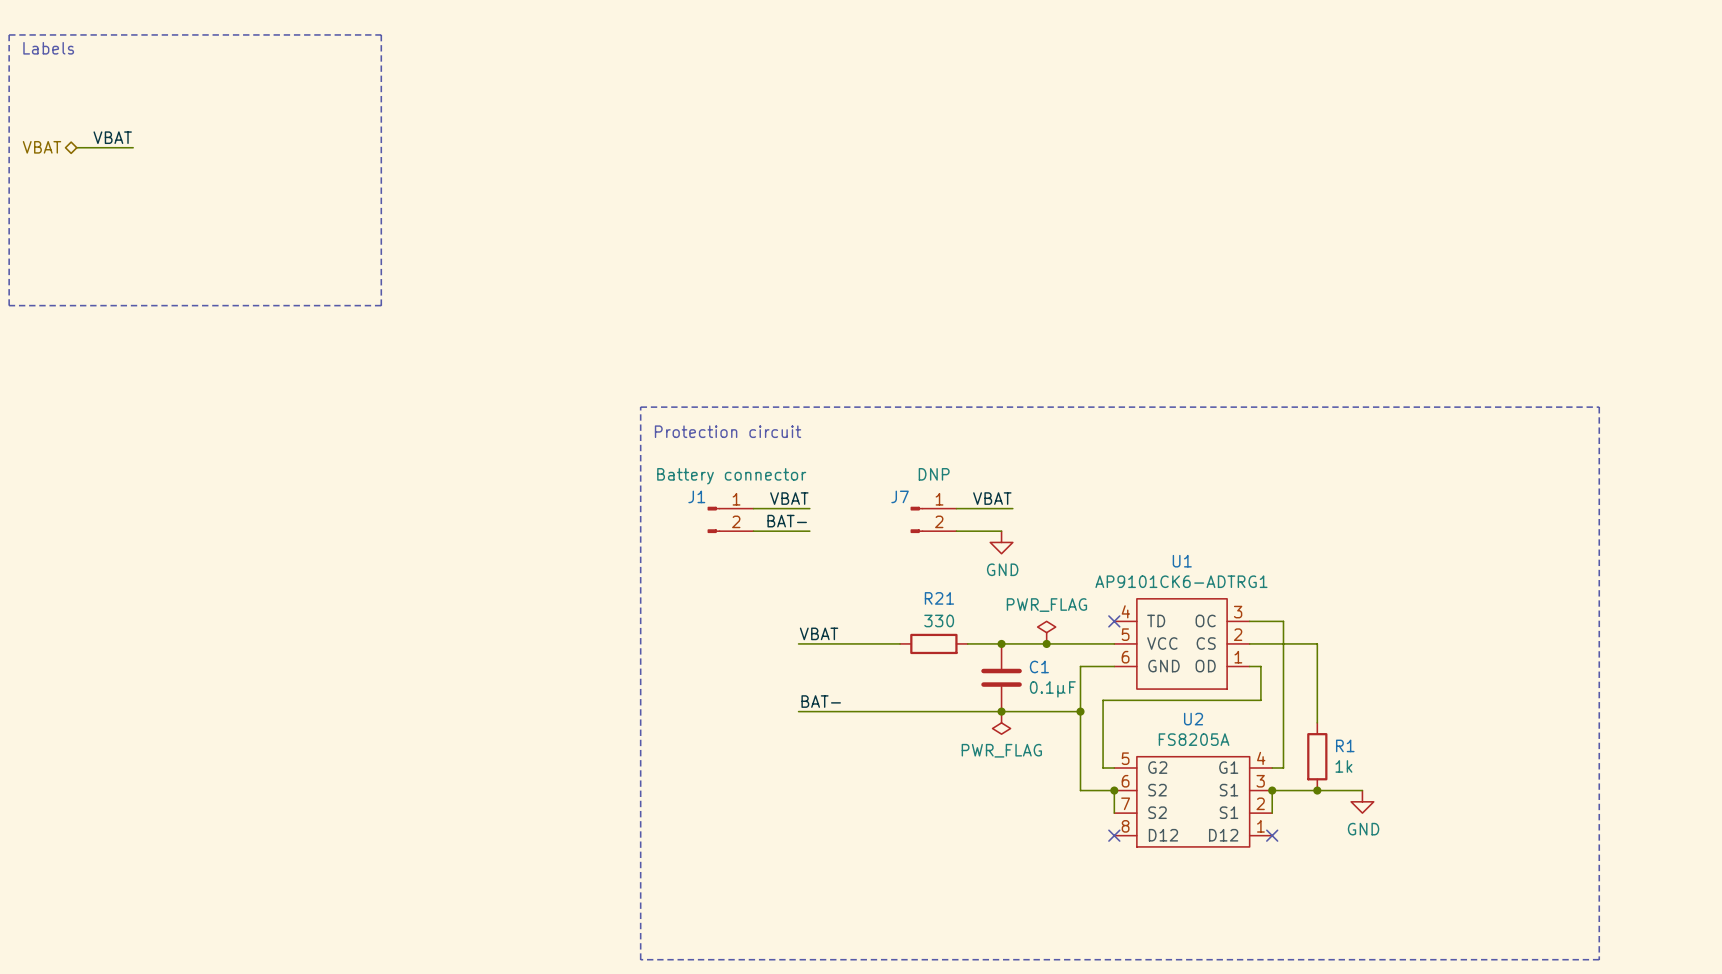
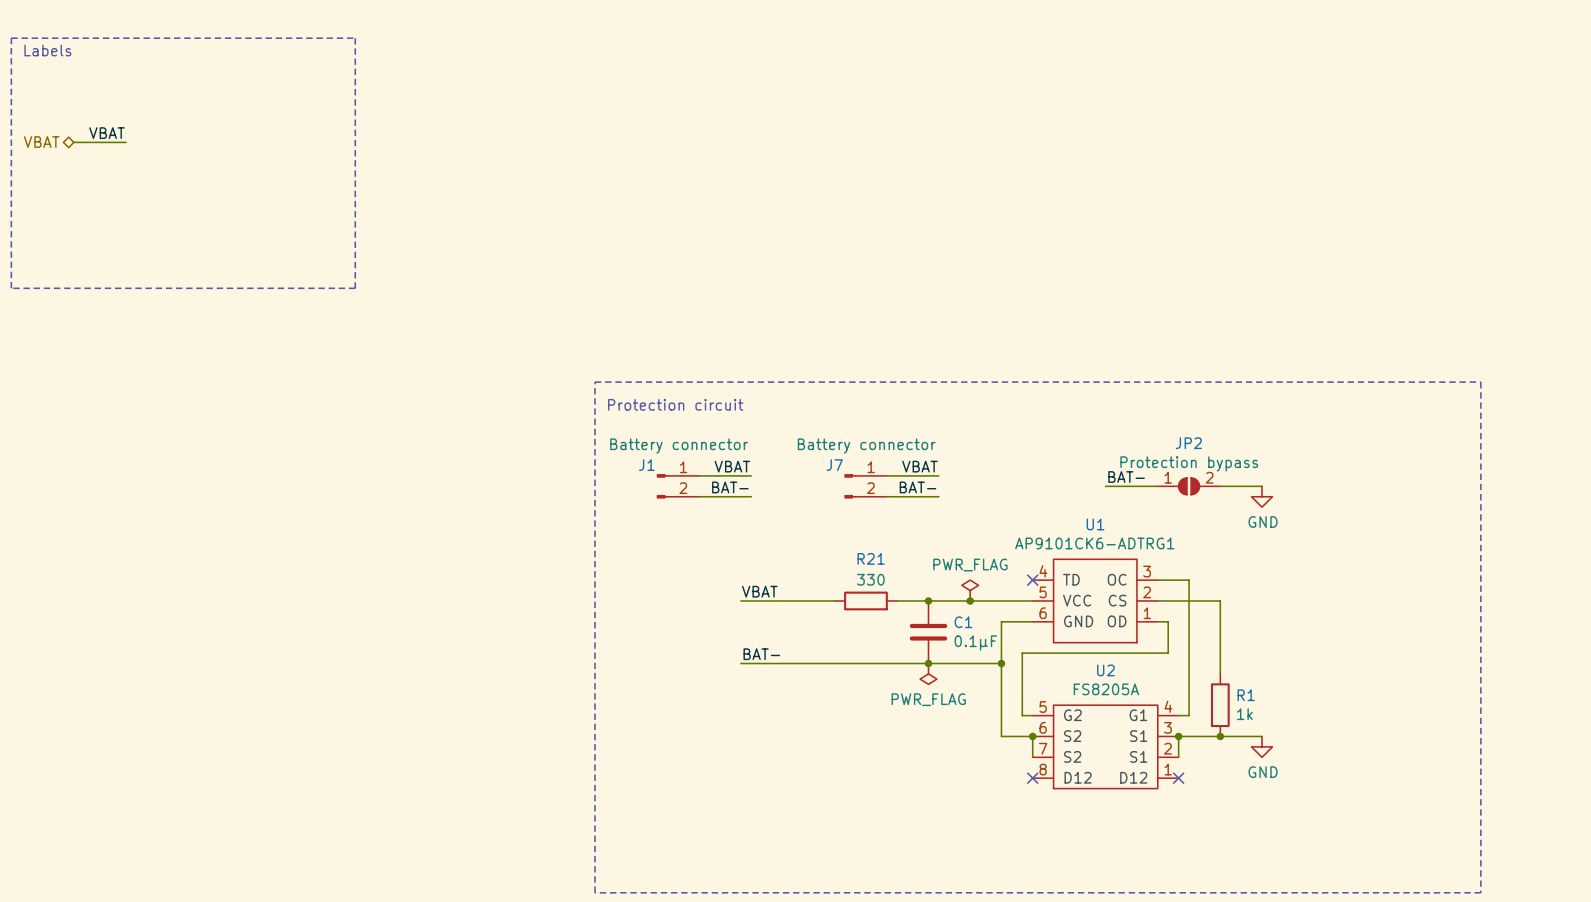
J7 value: DNP (934, 474) -> Battery connector (866, 445)
label: none -> BAT- (1126, 477)
wire: none -> (1105, 486) (1157, 486)
JP2: none -> Protection bypass (1189, 486)
wire: none -> (1220, 486) (1262, 486)
label: none -> BAT- (917, 487)
wire: none -> (928, 496) (938, 496)
power symbol: none -> GND (1262, 496)
power symbol: GND (1001, 542) -> none

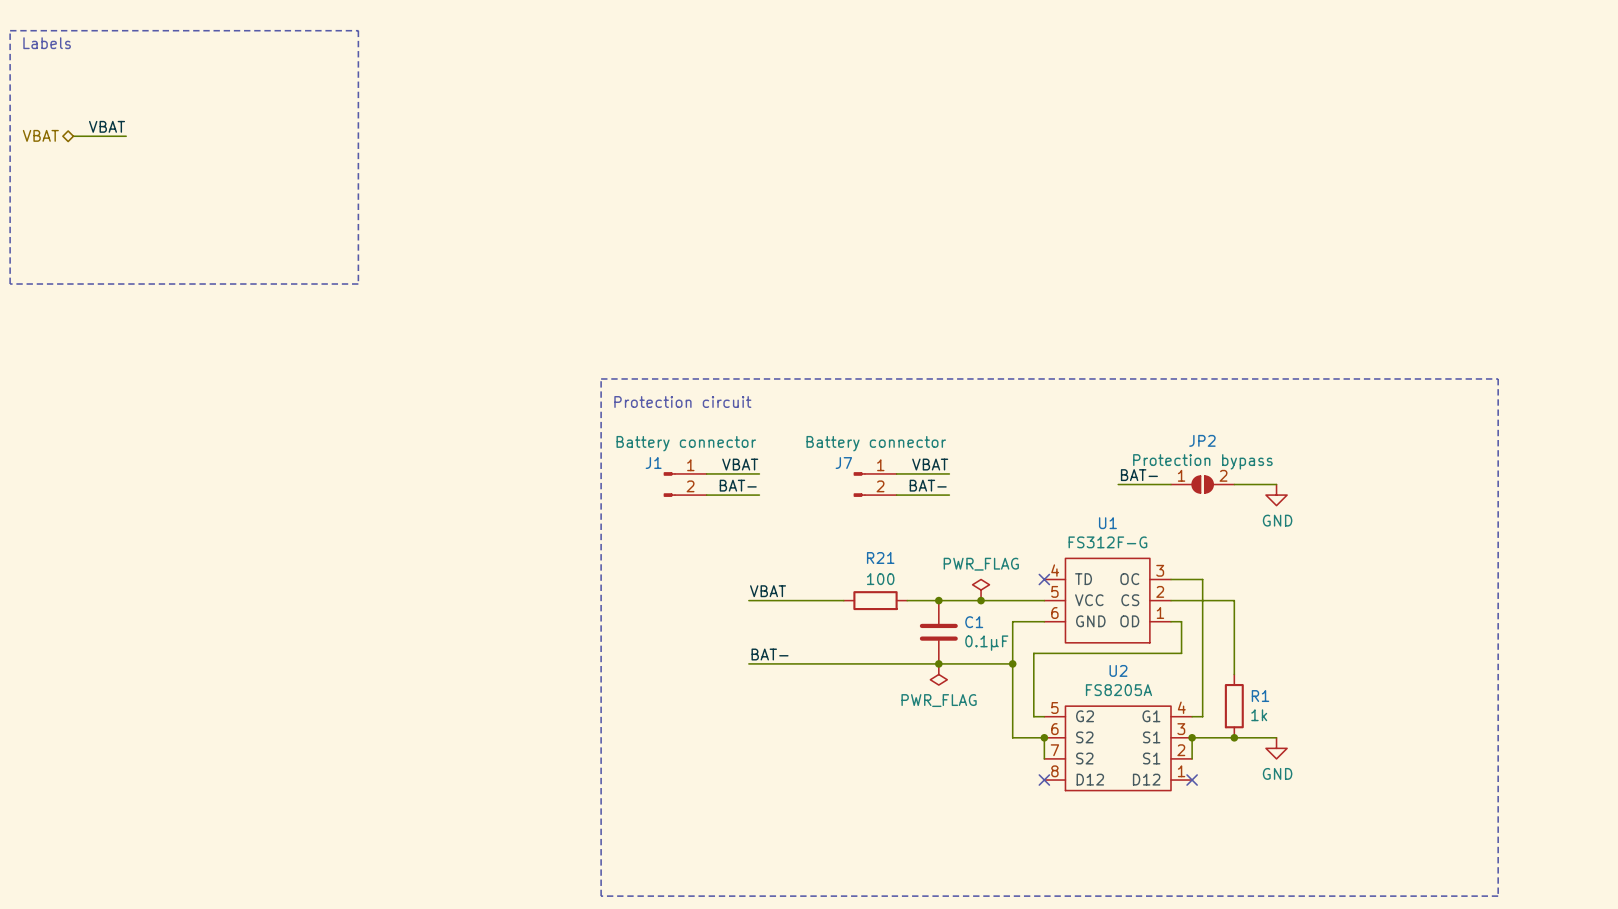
U1 value: AP9101CK6-ADTRG1 (1094, 543) -> FS312F-G (1107, 542)
R21 value: 330 (870, 579) -> 100 (880, 579)

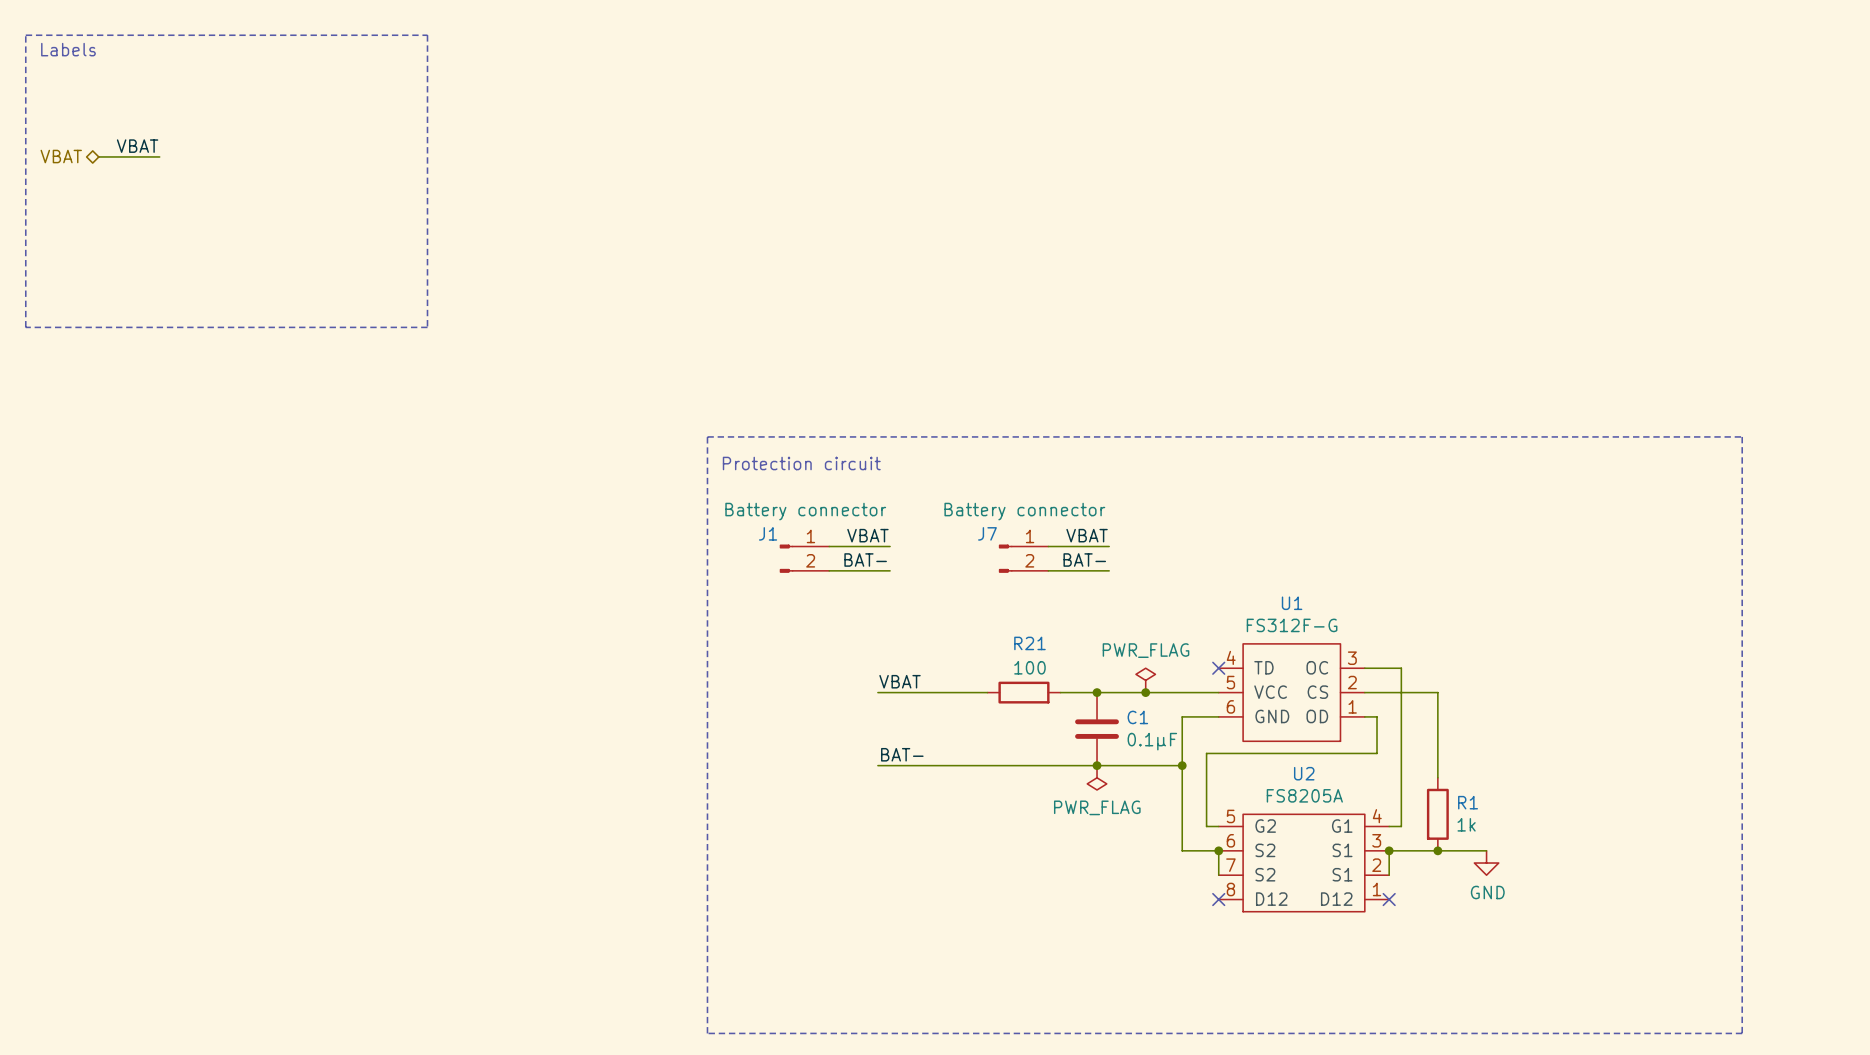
label: BAT- (1139, 475) -> none
wire: (1118, 484) (1171, 484) -> none
JP2: Protection bypass (1202, 484) -> none
wire: (1234, 484) (1276, 484) -> none
power symbol: GND (1276, 495) -> none

